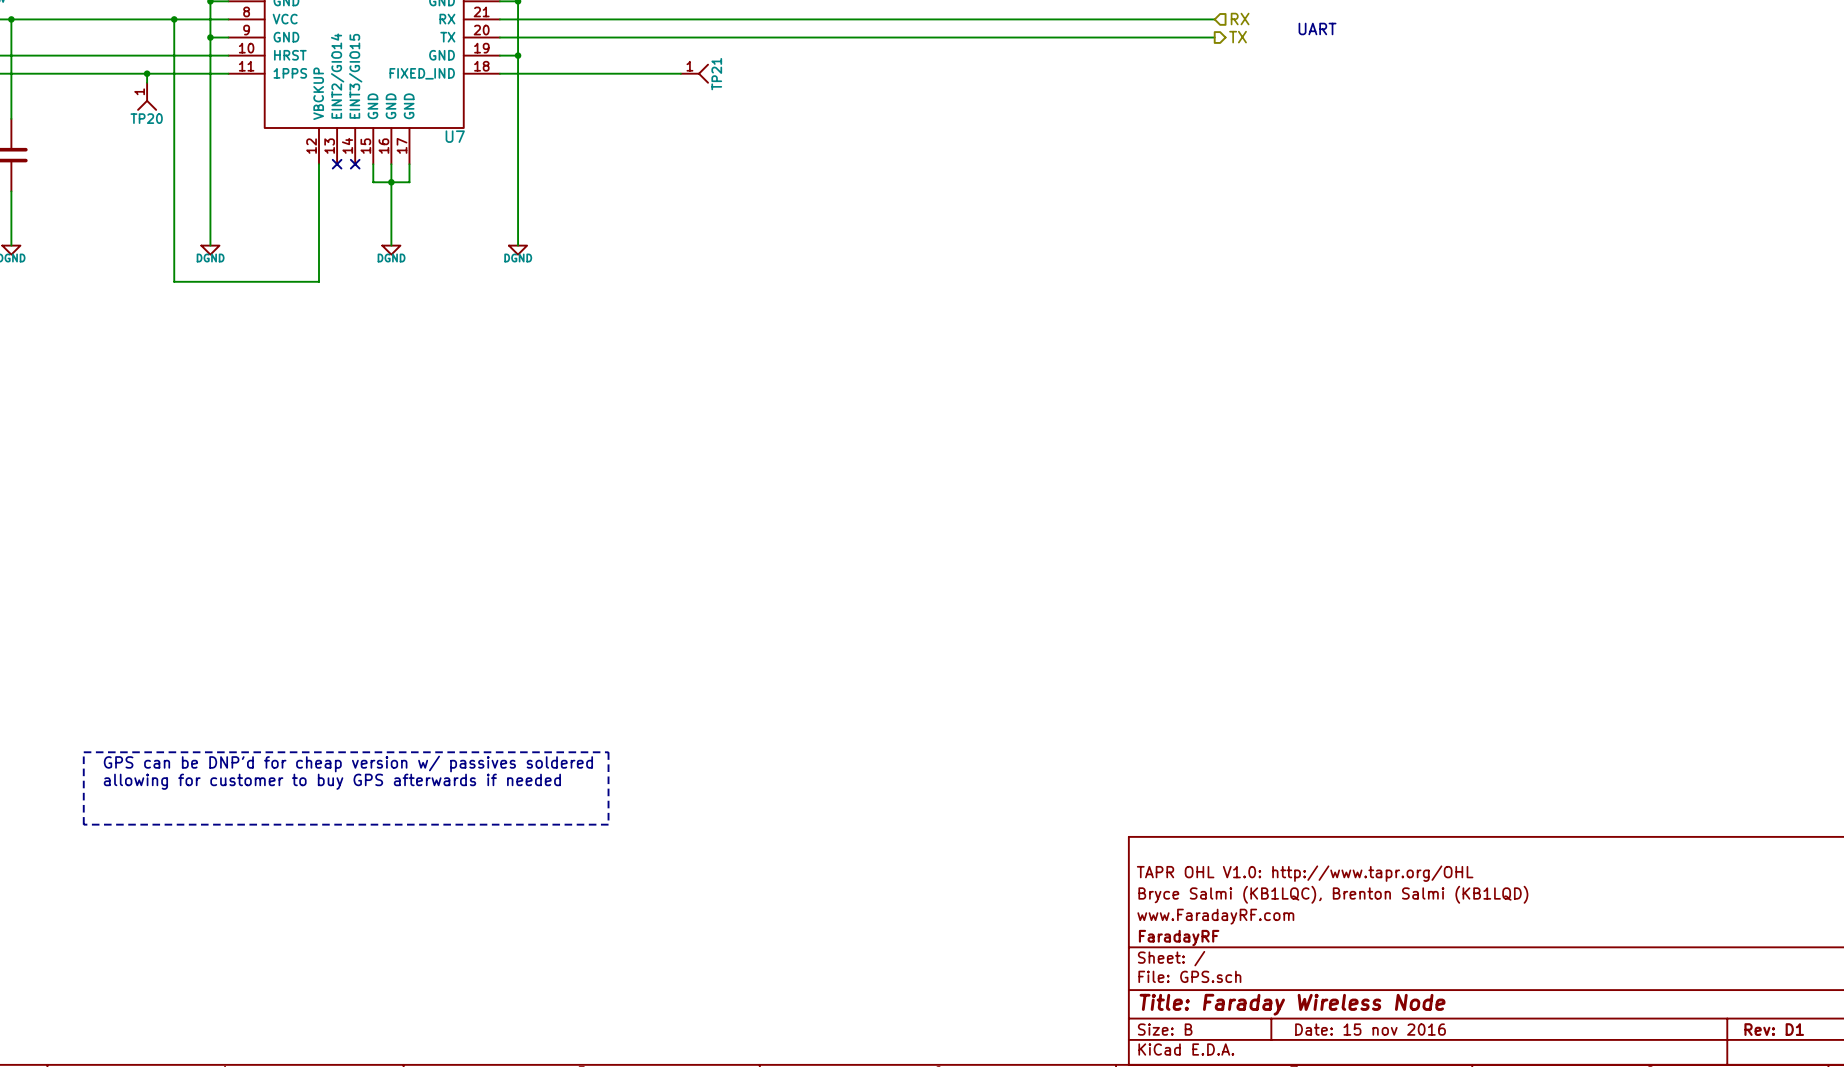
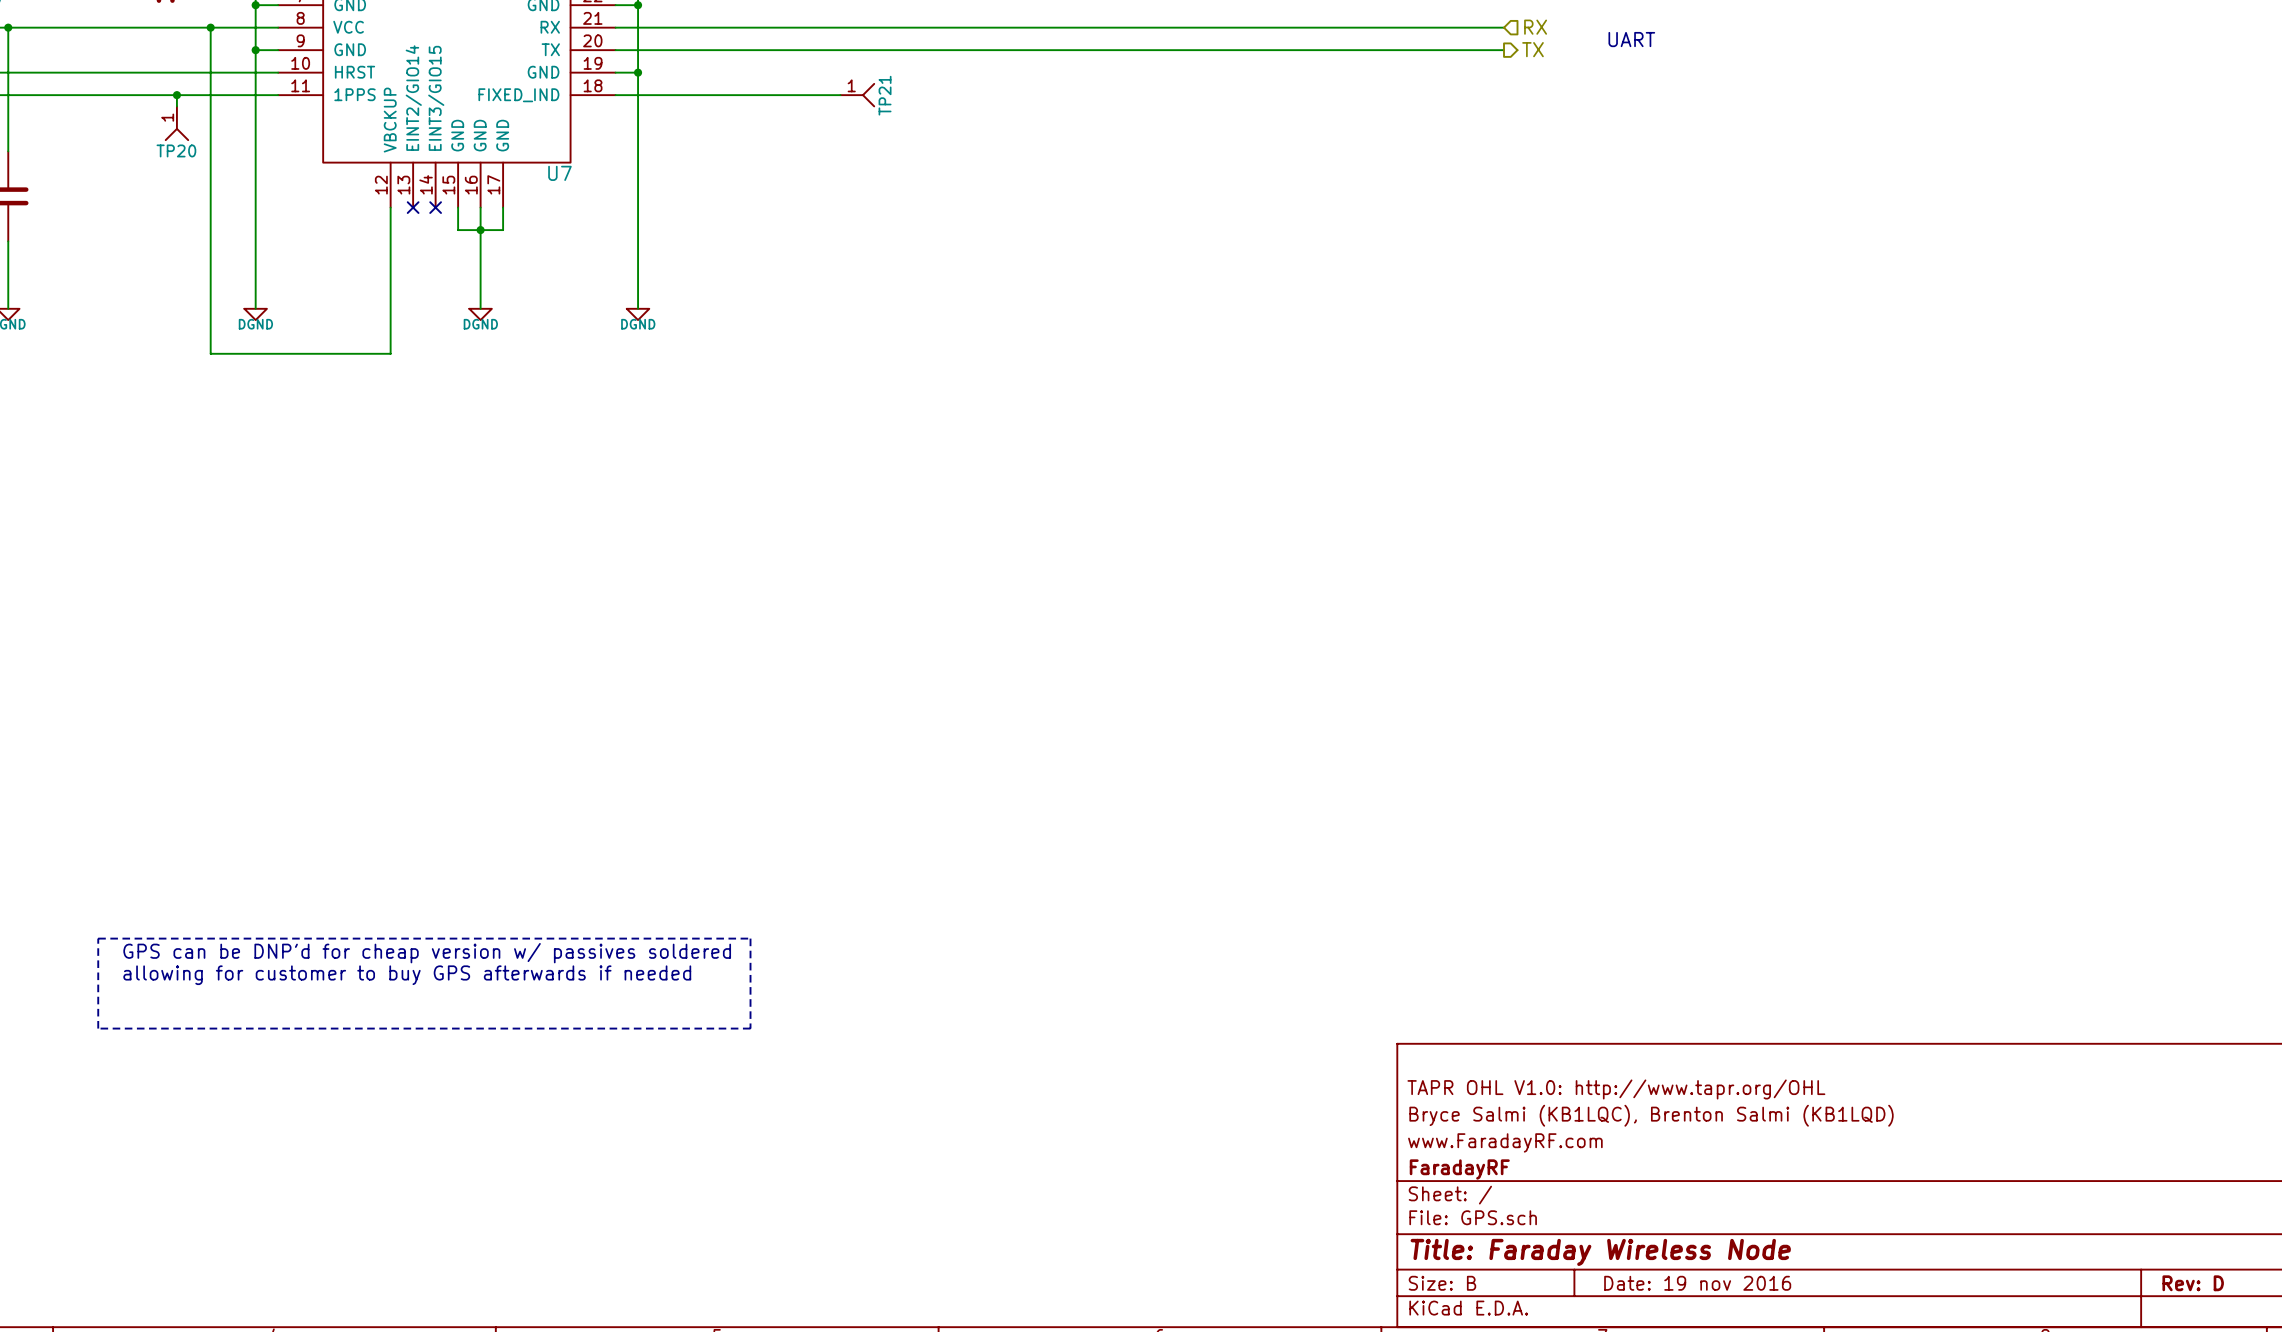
title block: Date: 15 nov 2016 (1370, 1029) -> Date: 19 nov 2016 (1697, 1283)
title block: Rev: D1 (1774, 1029) -> Rev: D (2193, 1283)

